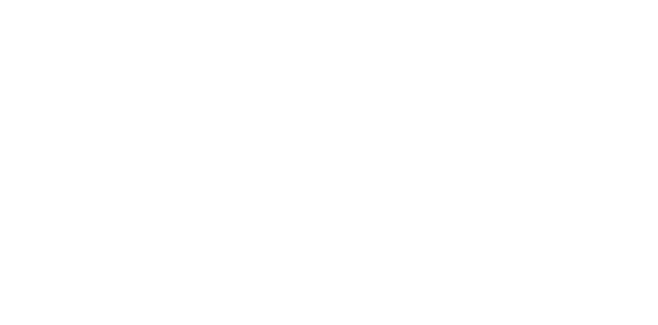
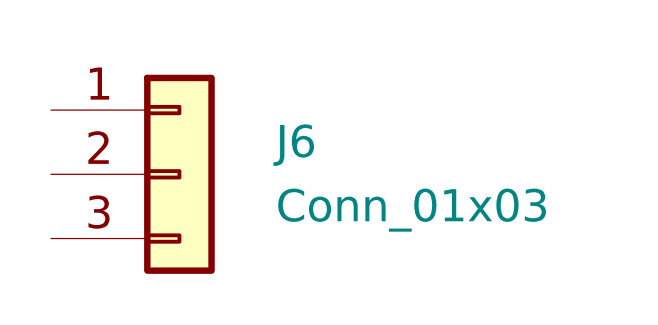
J6: none -> Conn_01x03 (132, 174)

